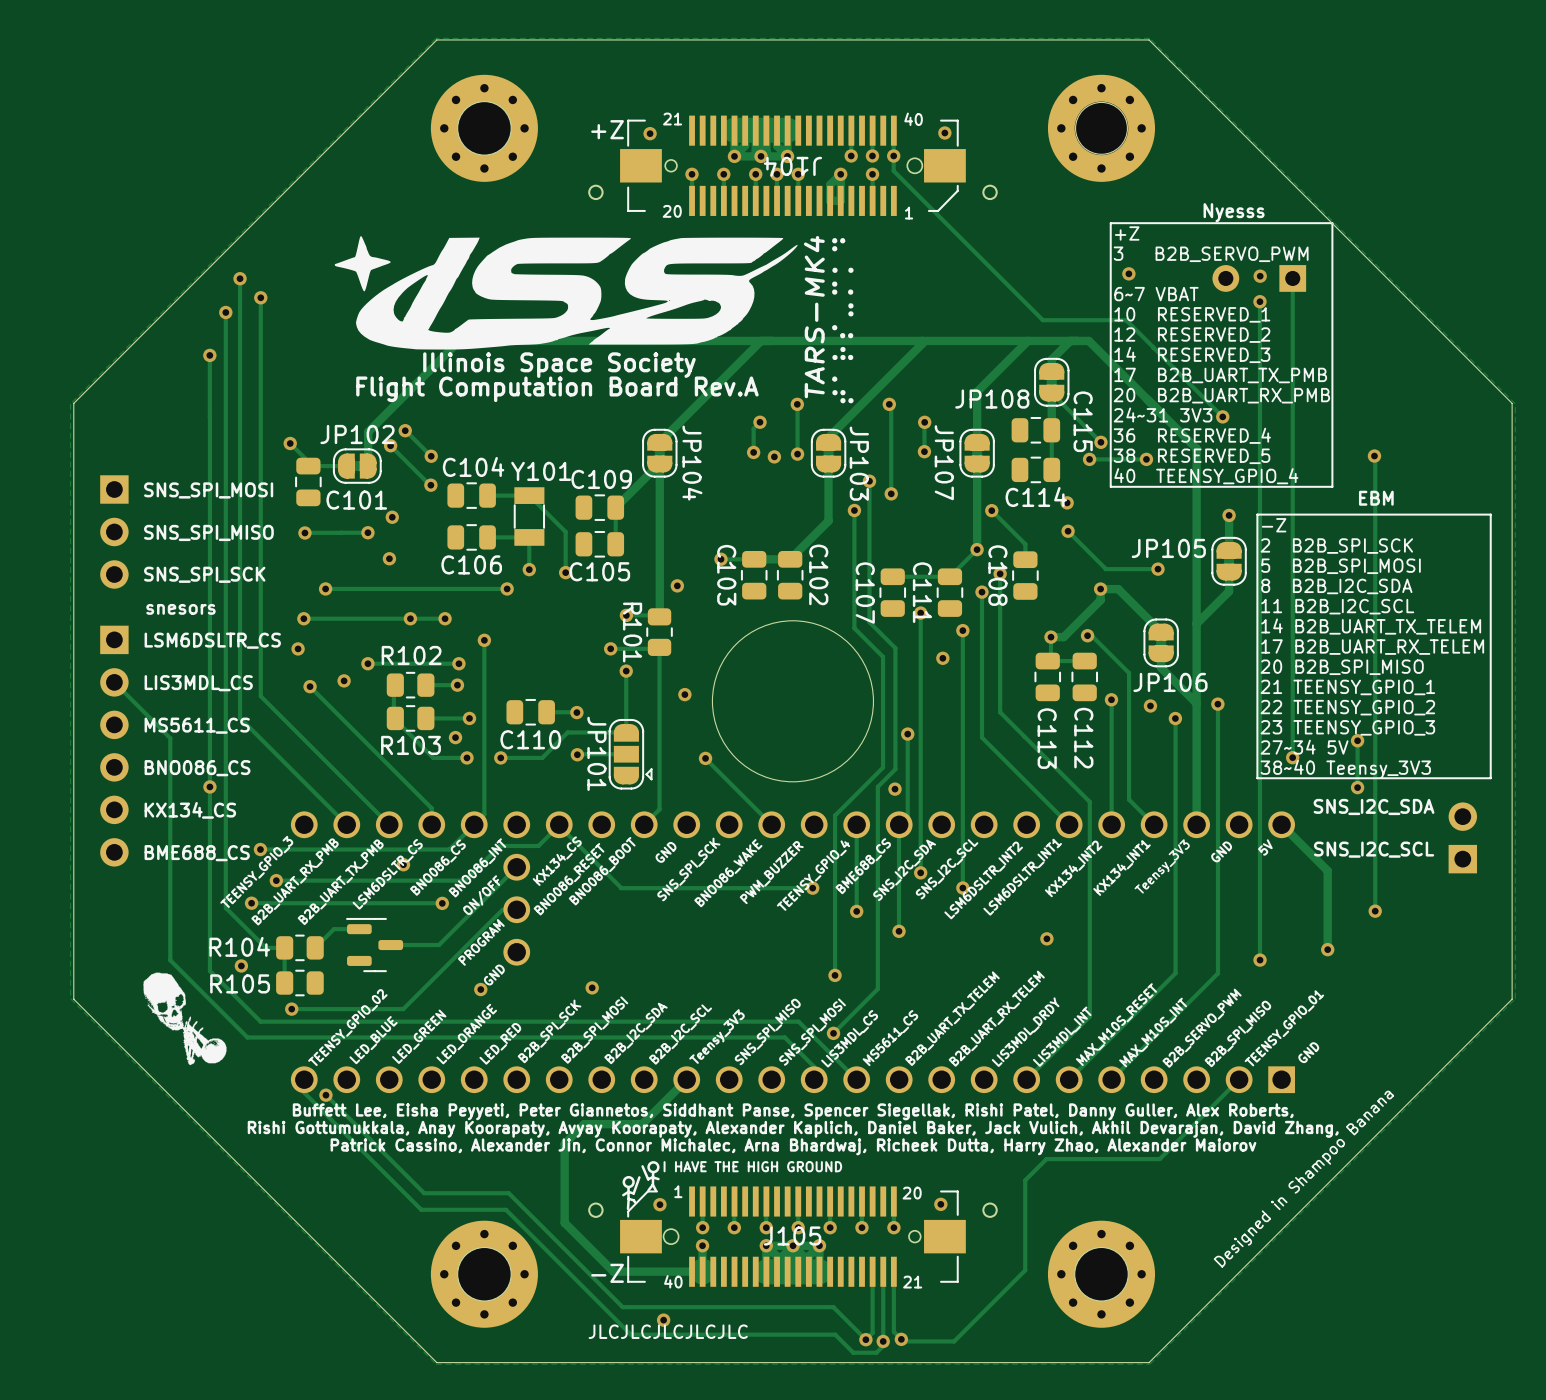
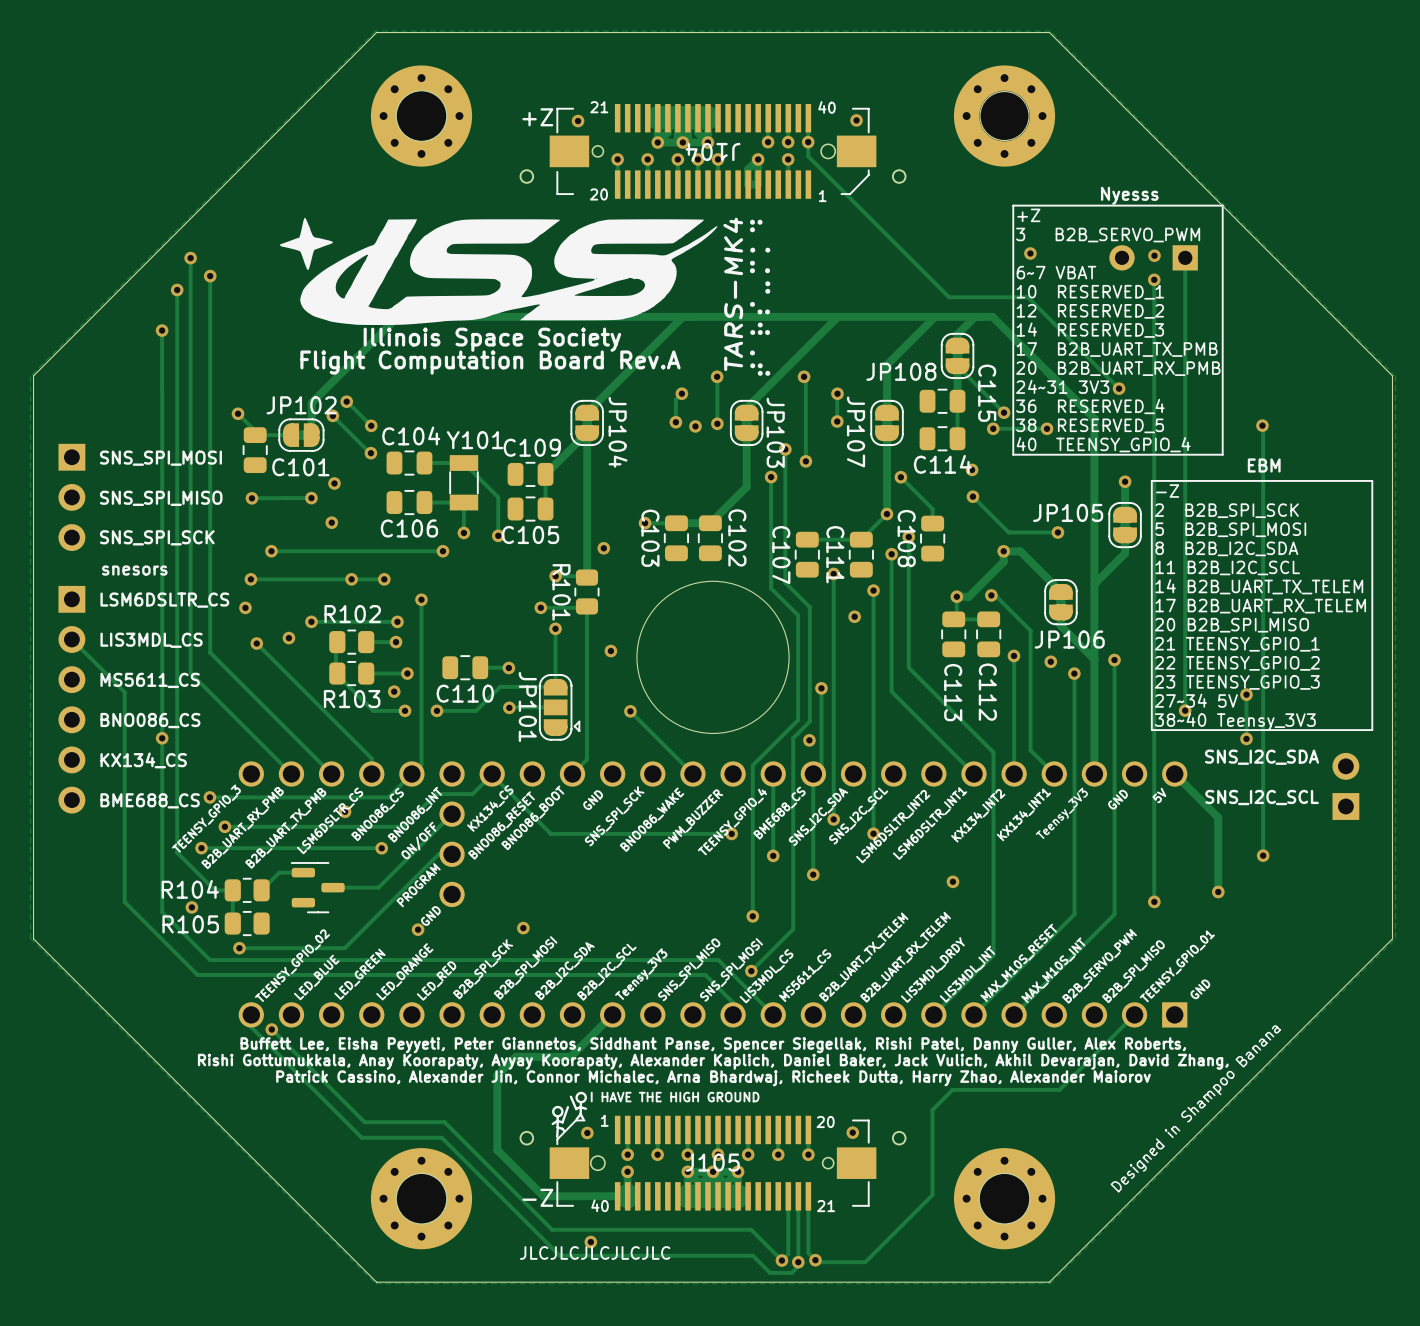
drawing: [143, 972, 227, 1066] -> none

